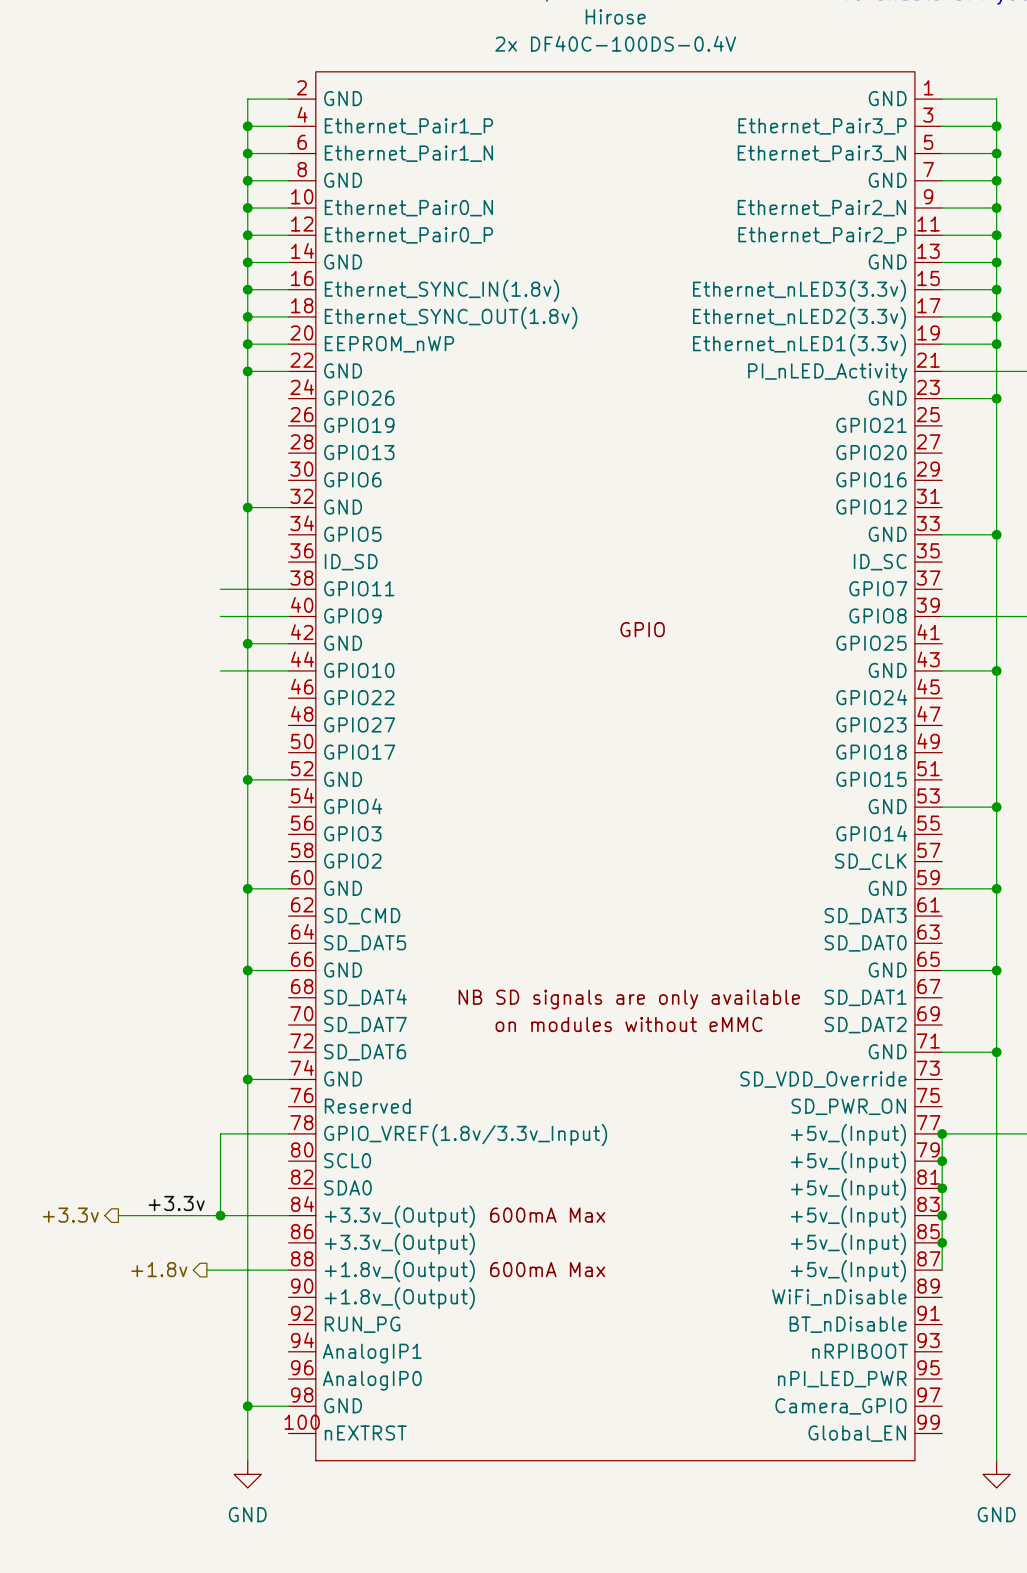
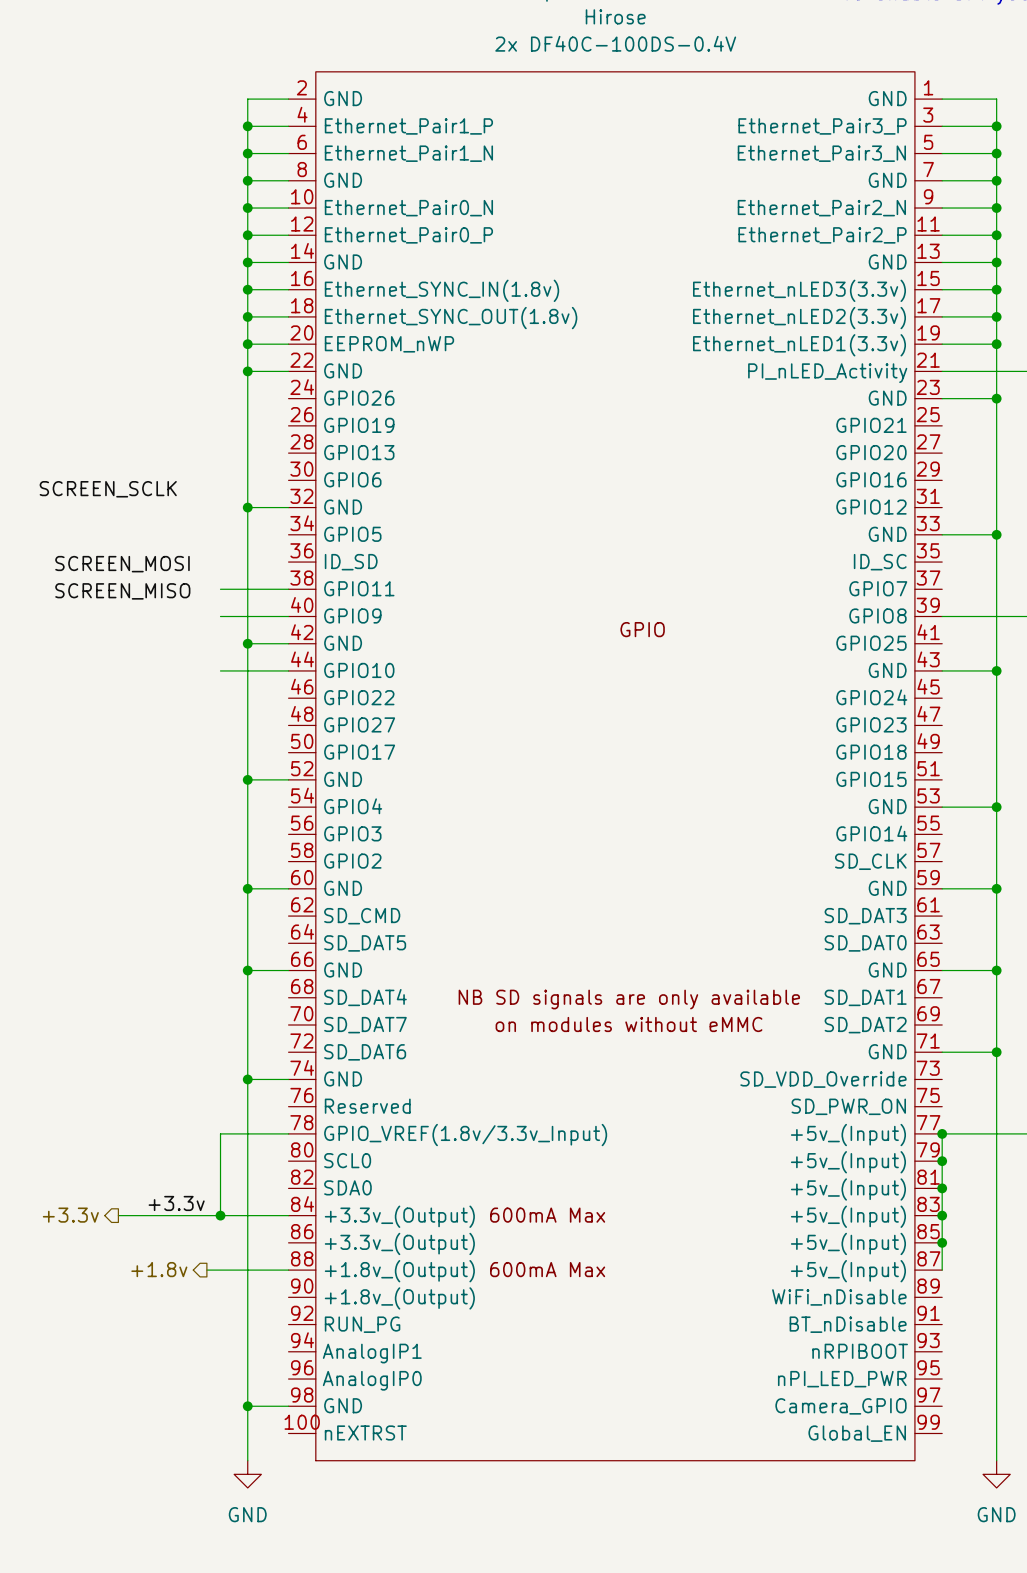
label: none -> SCREEN_SCLK (108, 489)
label: none -> SCREEN_MOSI (122, 564)
label: none -> SCREEN_MISO (122, 591)

